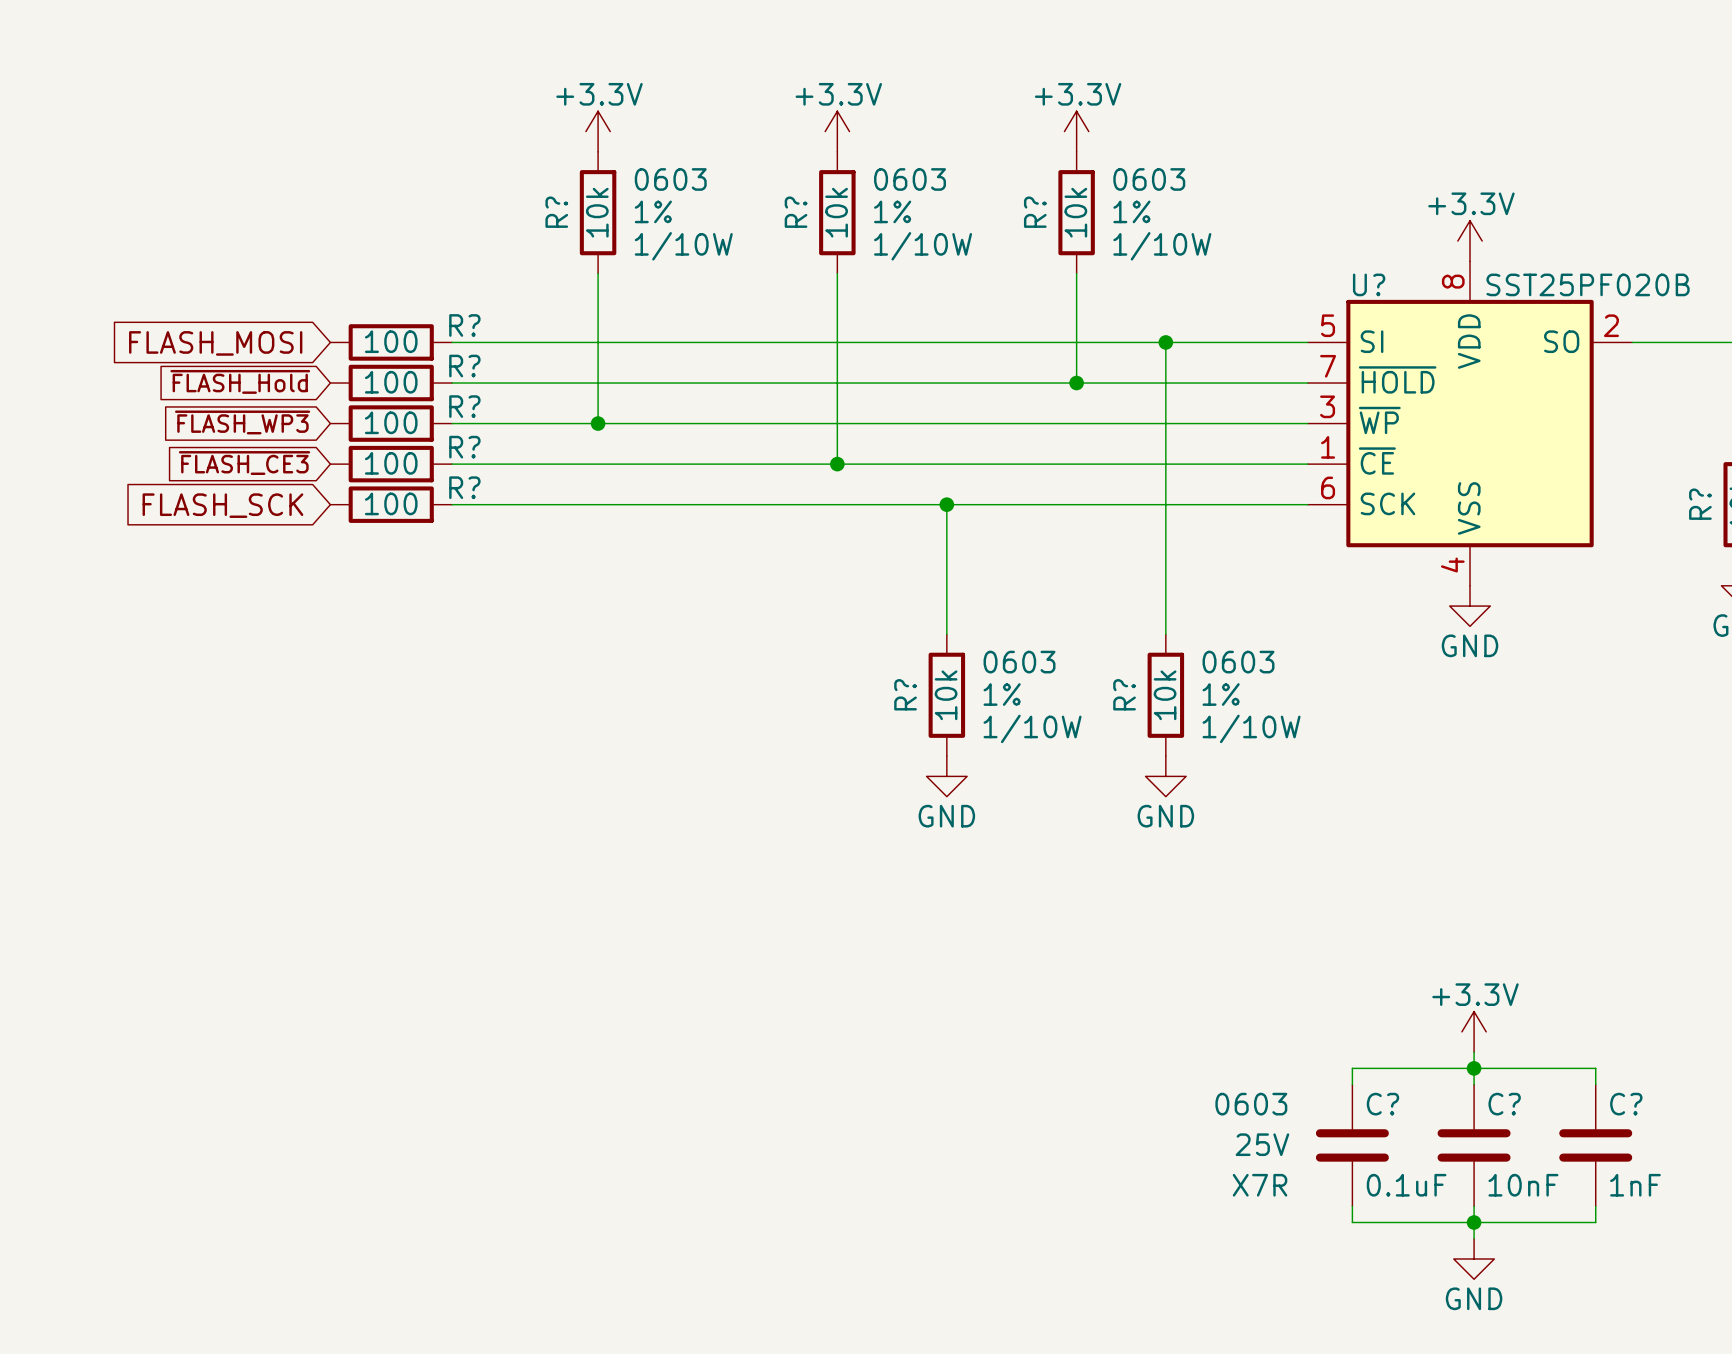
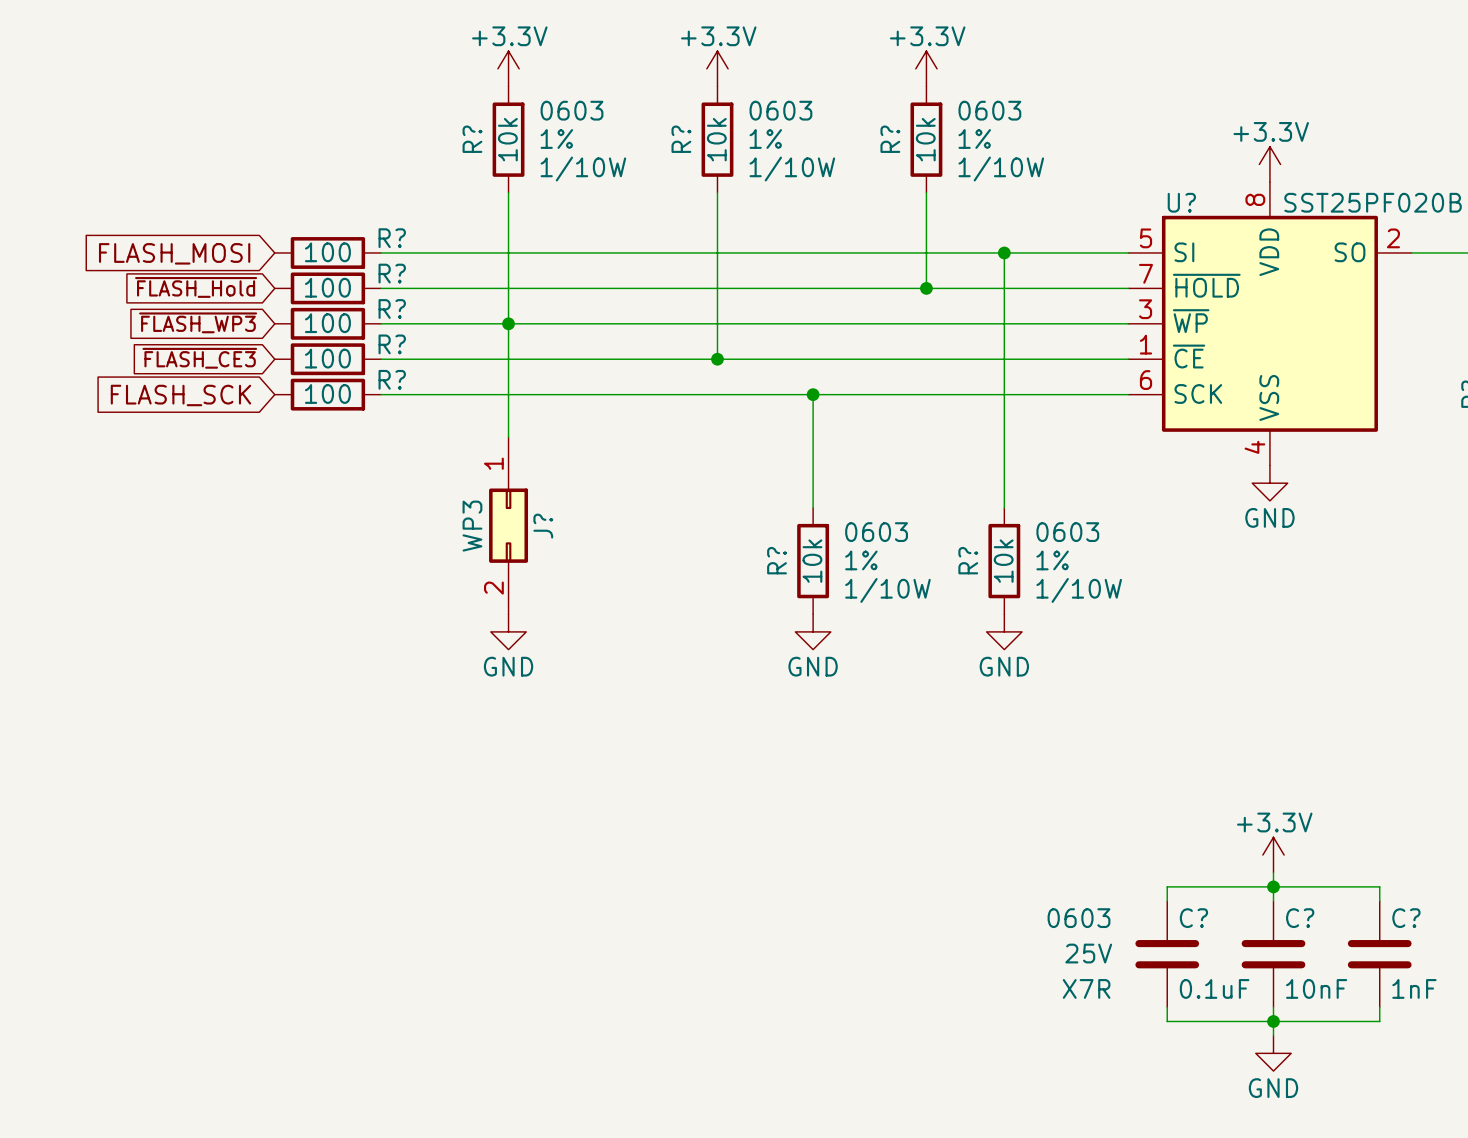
wire: none -> (508, 323) (508, 437)
J?: none -> WP3 (508, 525)
power symbol: none -> GND (508, 631)

